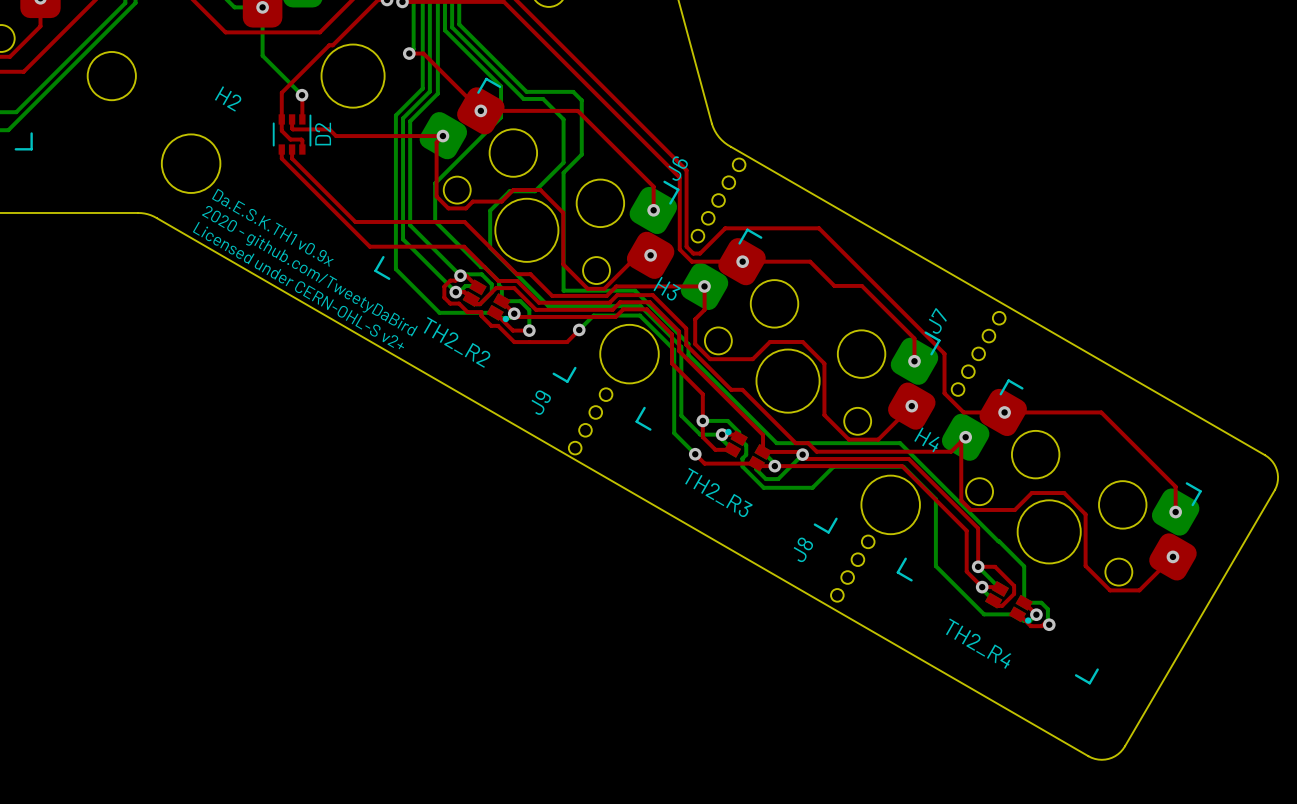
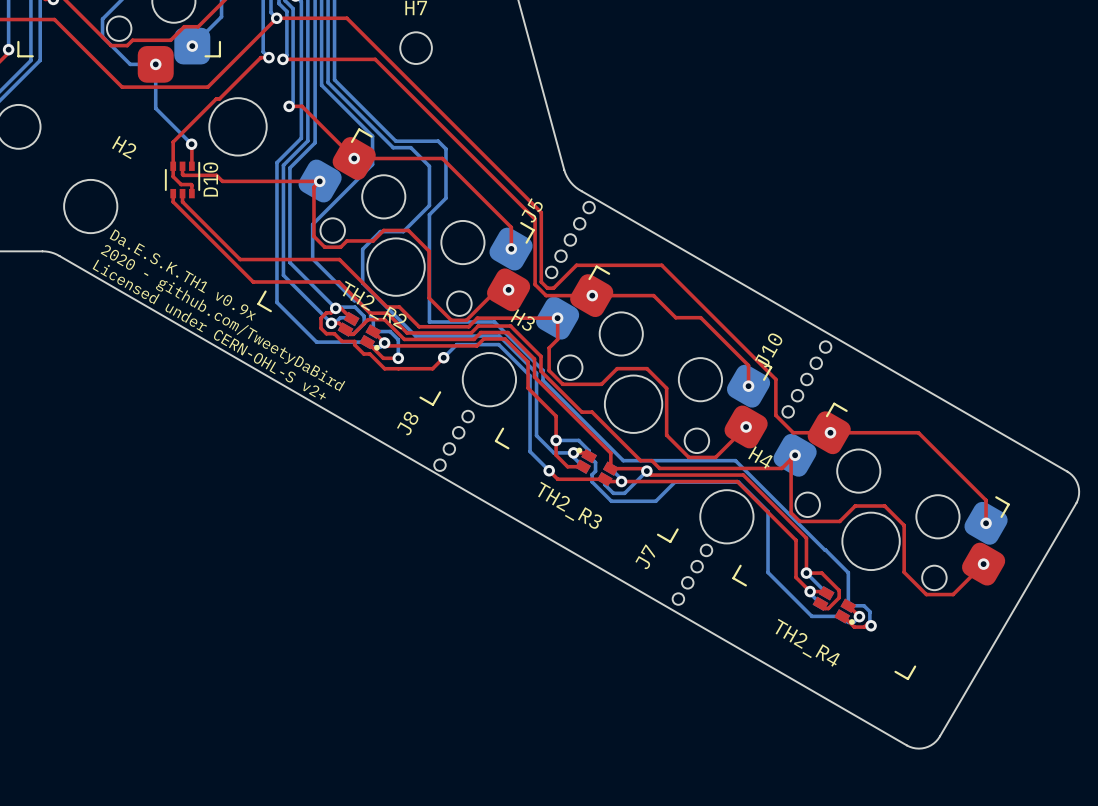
D2 name: D2 (323, 134) -> D10 (210, 179)
J6 name: J6 (678, 168) -> J5 (532, 210)
J7 name: J7 (937, 320) -> J10 (768, 350)
TH2_R2 name position: TH2_R2 (457, 342) -> TH2_R2 (374, 305)
J9 name: J9 (541, 402) -> J8 (407, 423)
J8 name: J8 (803, 549) -> J7 (645, 556)

